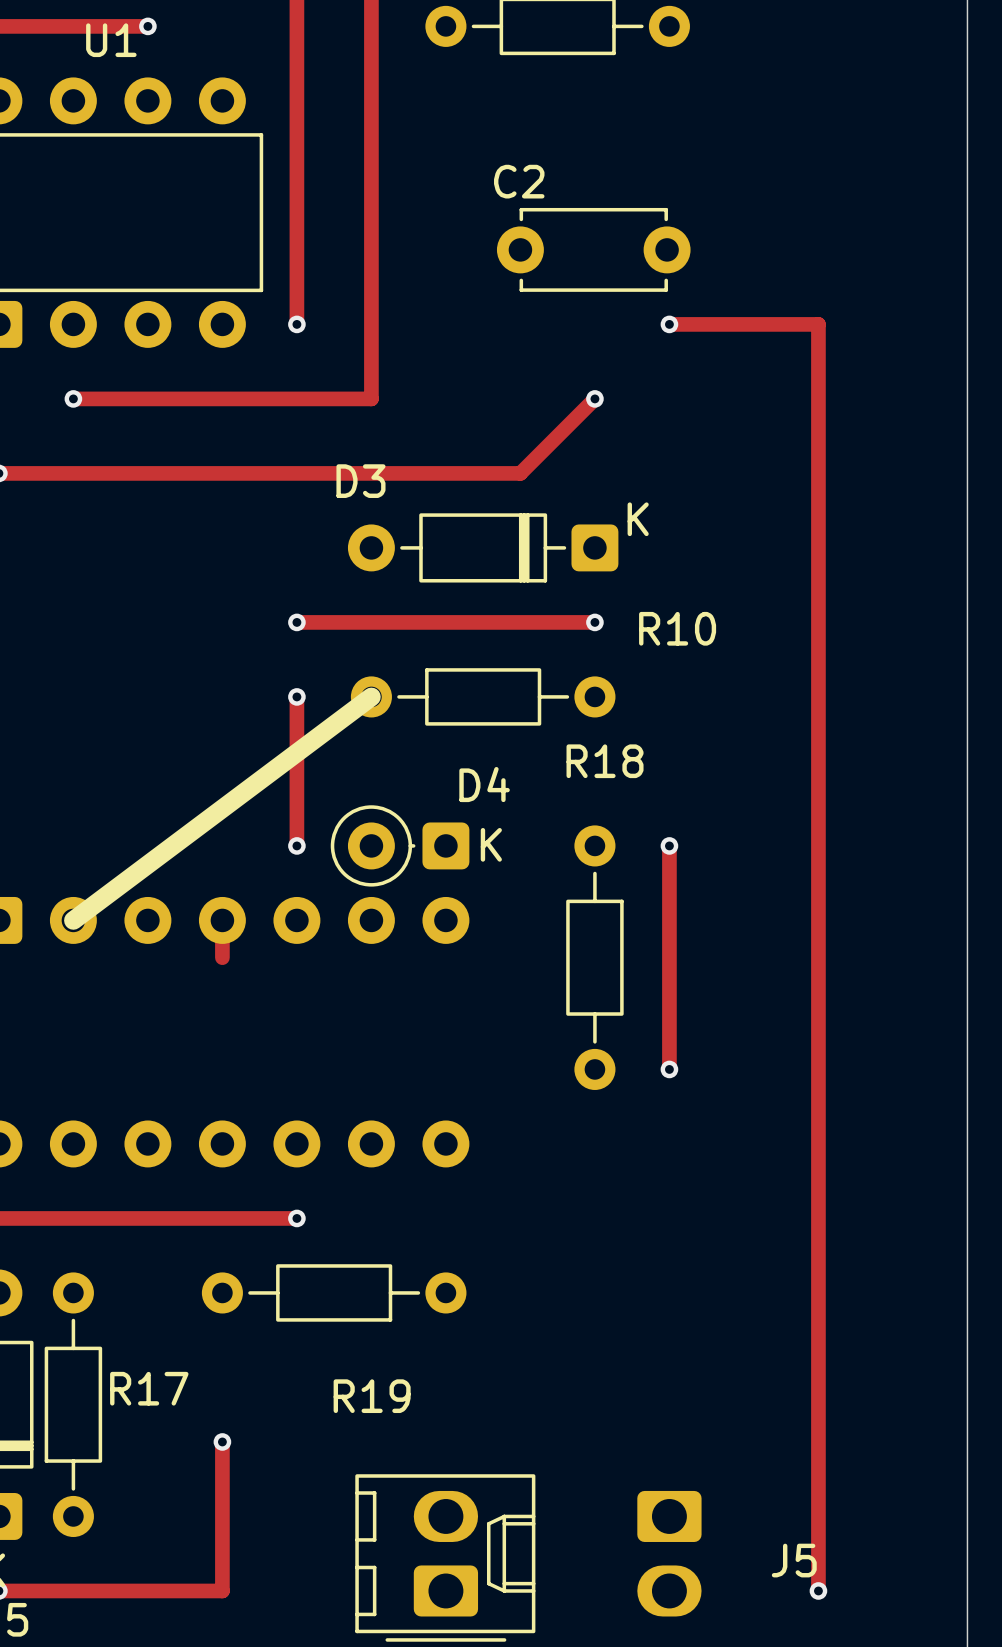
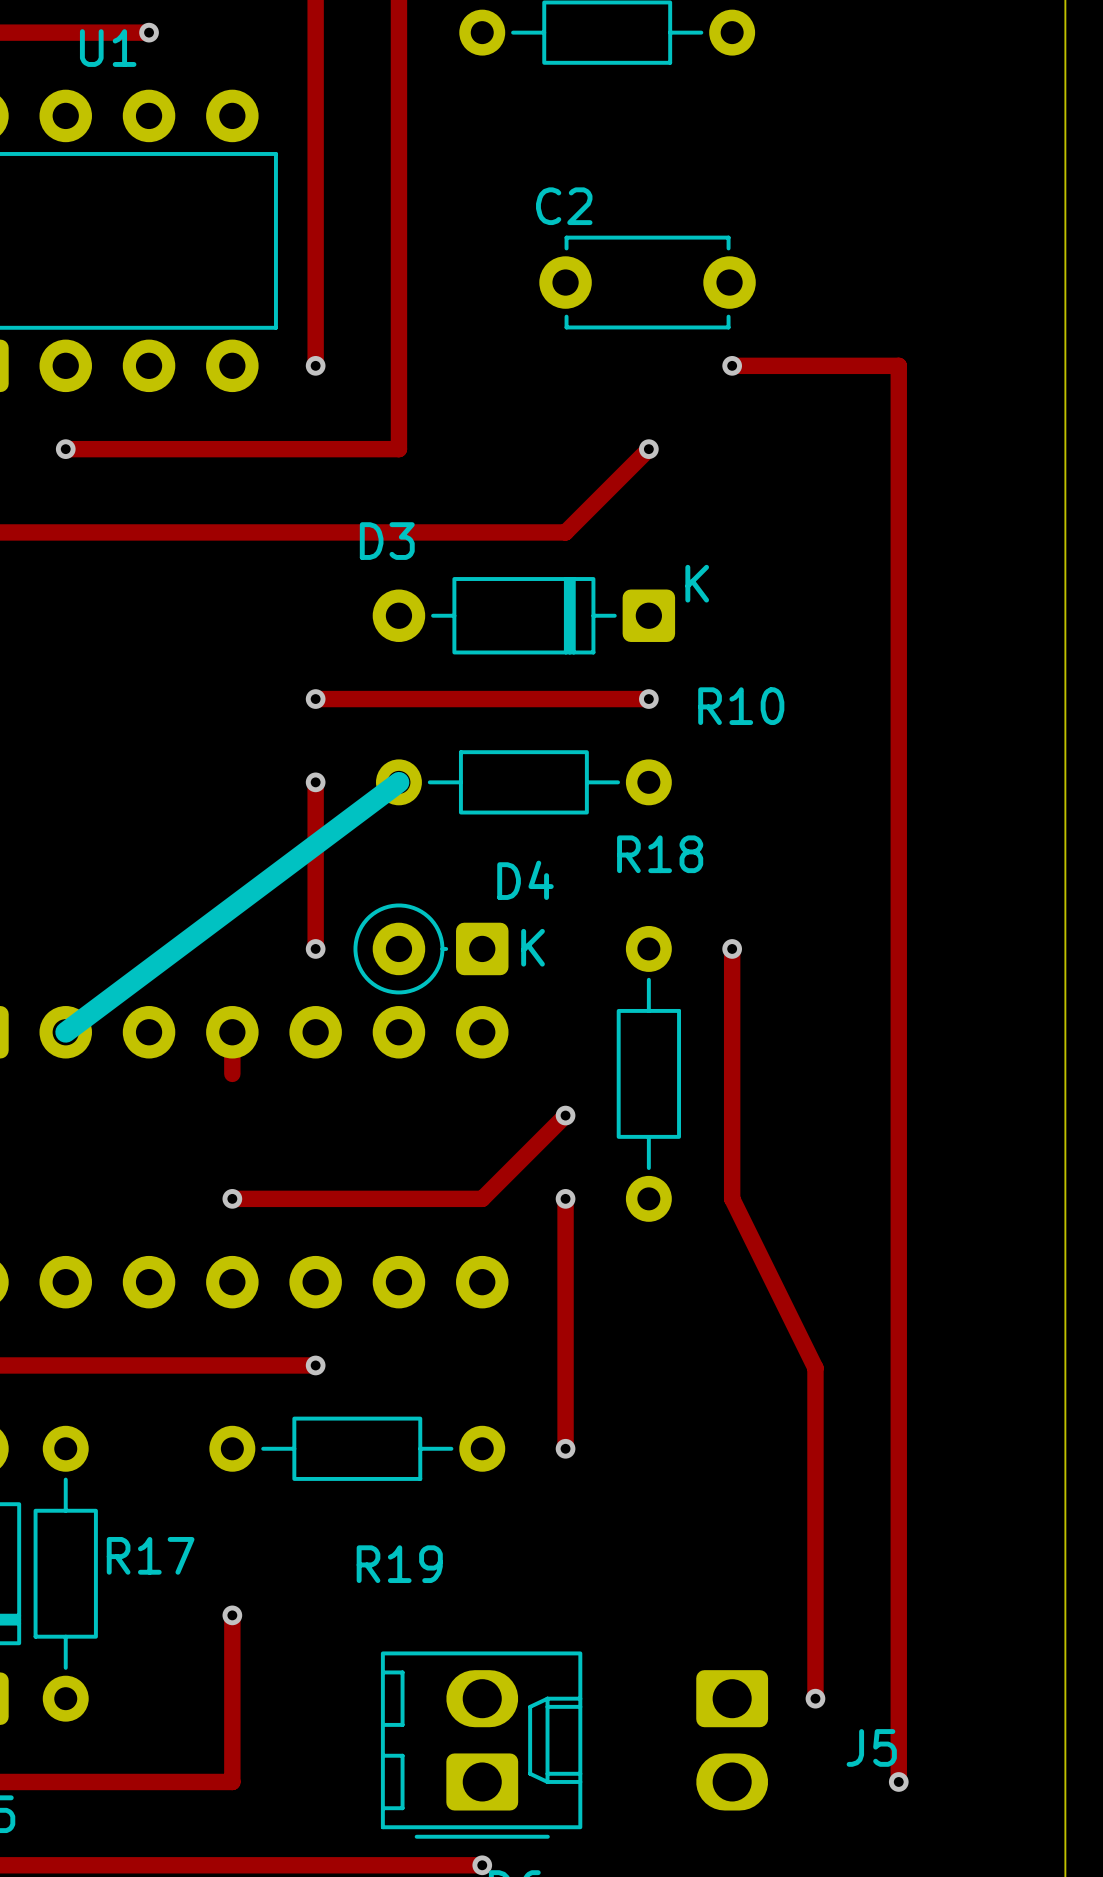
track: none -> (565, 1115) (482, 1198) (232, 1198)
via: none -> (565, 1115)
via: none -> (232, 1198)
track: none -> (565, 1198) (565, 1448)
via: none -> (565, 1198)
track: none -> (732, 1198) (815, 1368) (815, 1698)
via: (669, 1069) -> none
via: none -> (565, 1448)
via: none -> (815, 1698)

